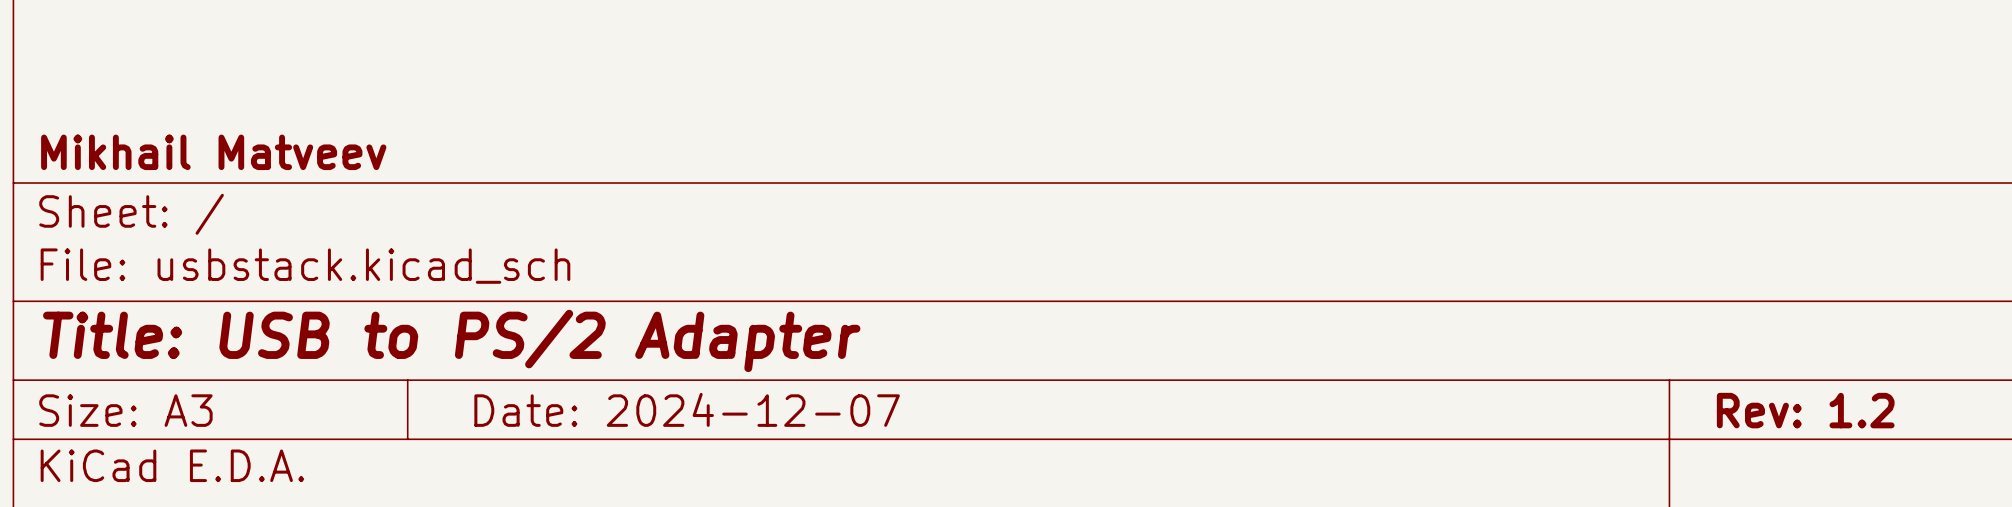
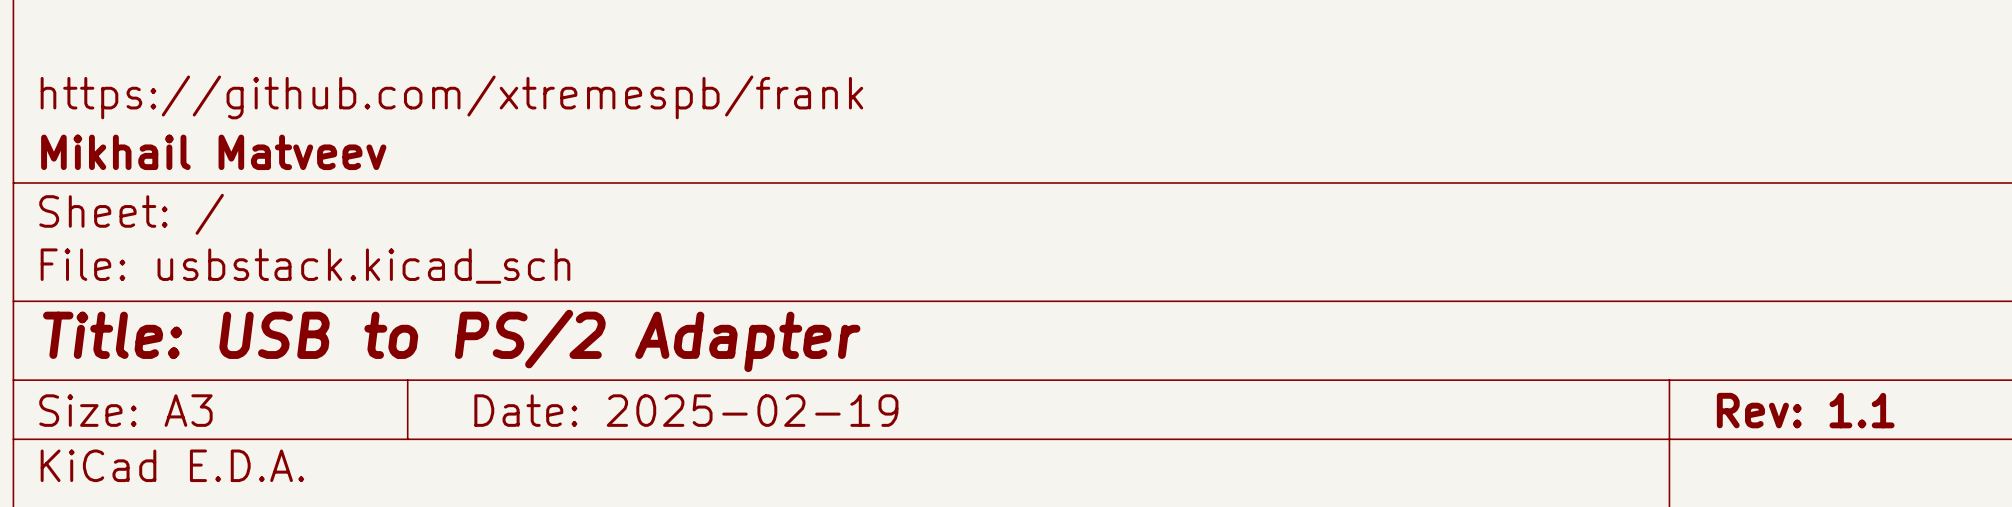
title block: none -> https://github.com/xtremespb/frank (451, 97)
title block: Date: 2024-12-07 (687, 409) -> Date: 2025-02-19 (686, 410)
title block: Rev: 1.2 (1805, 410) -> Rev: 1.1 (1805, 410)

